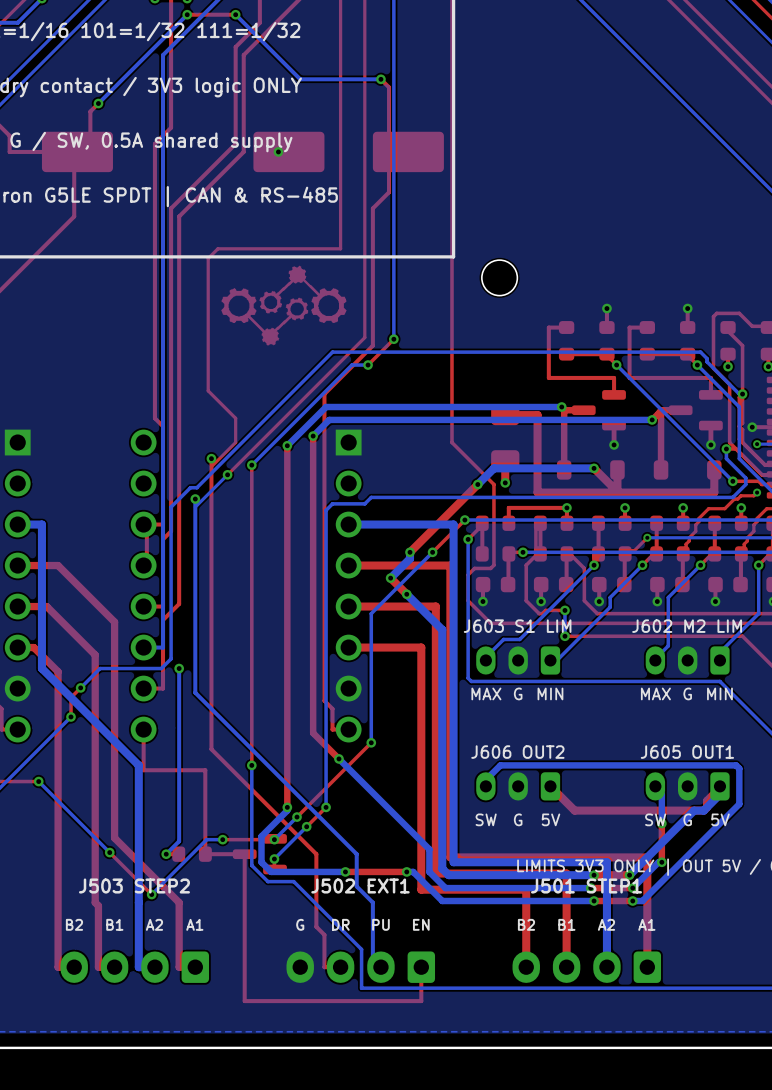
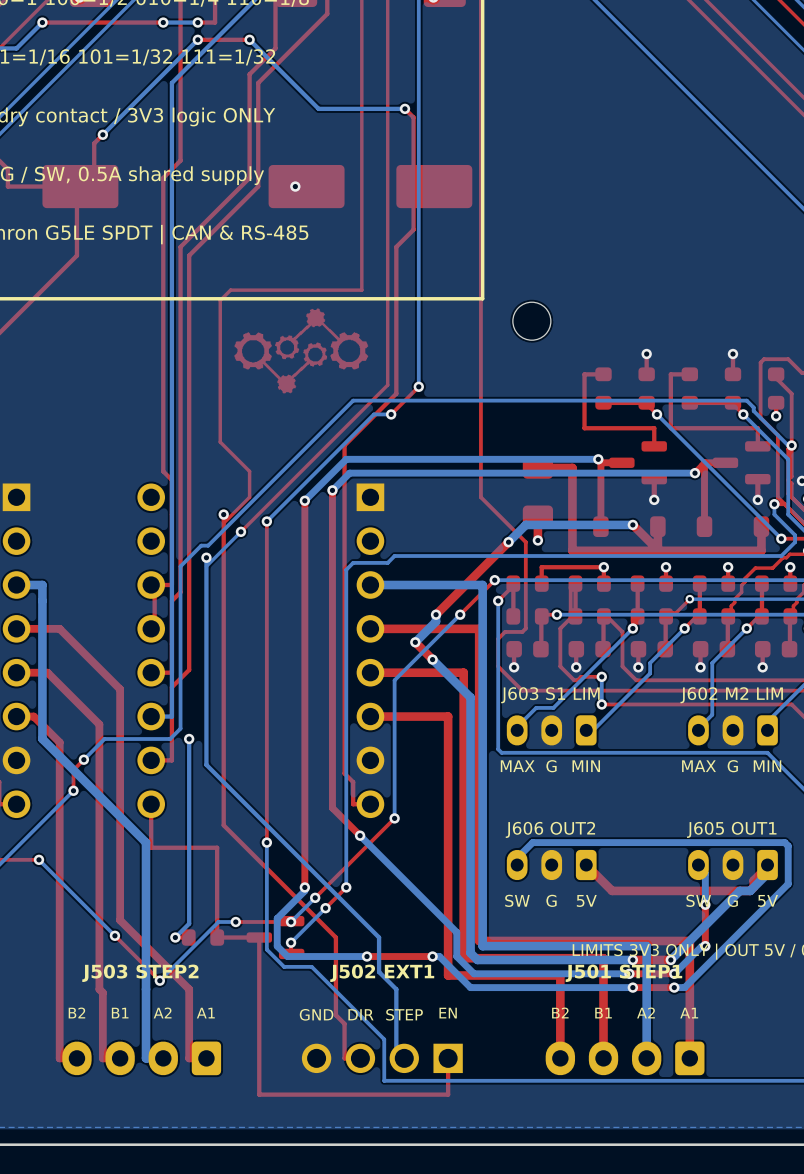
text: G (300, 924) -> GND (316, 1014)
text: DR (340, 924) -> DIR (360, 1014)
text: PU (380, 924) -> STEP (404, 1014)
part footprint: [286, 951, 436, 983] -> [301, 1043, 463, 1074]

